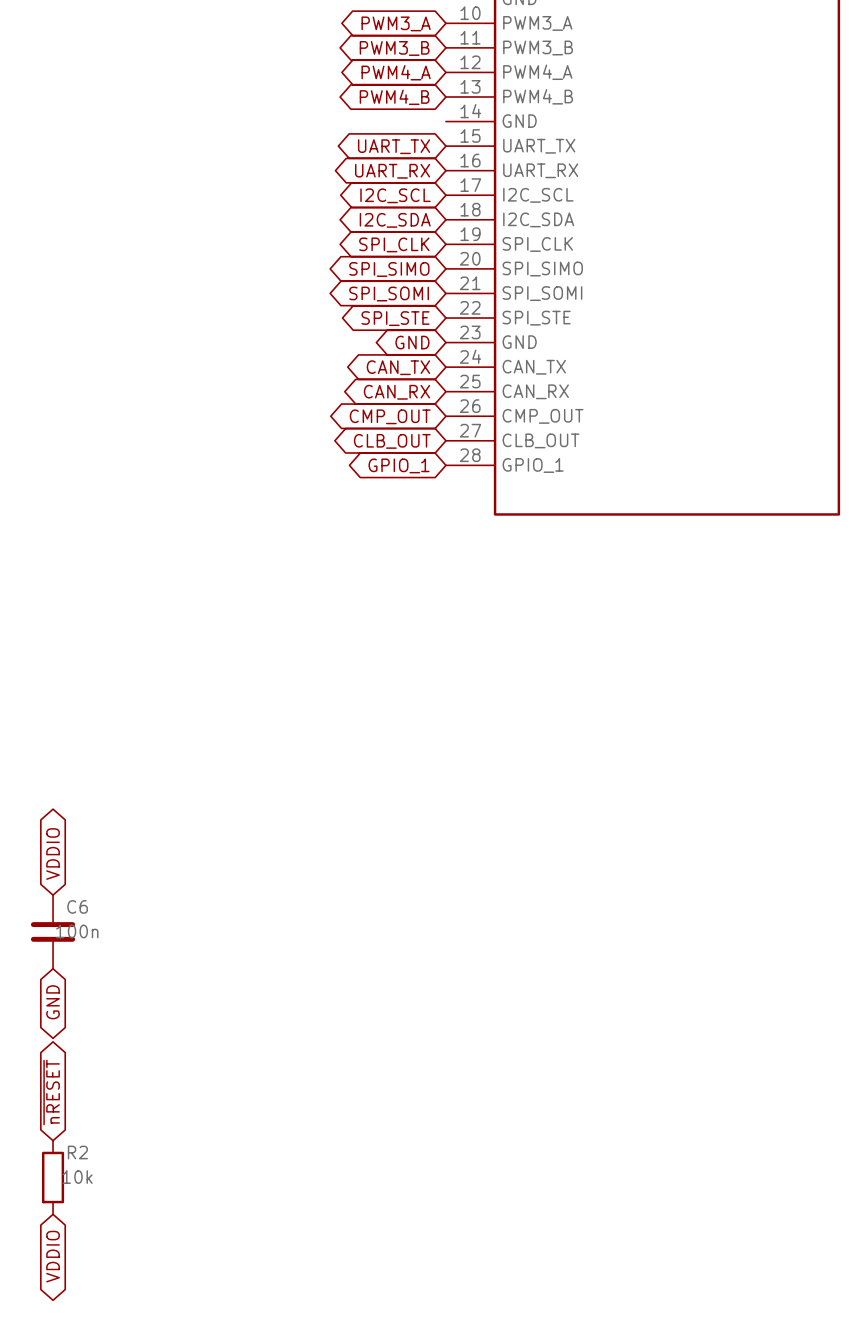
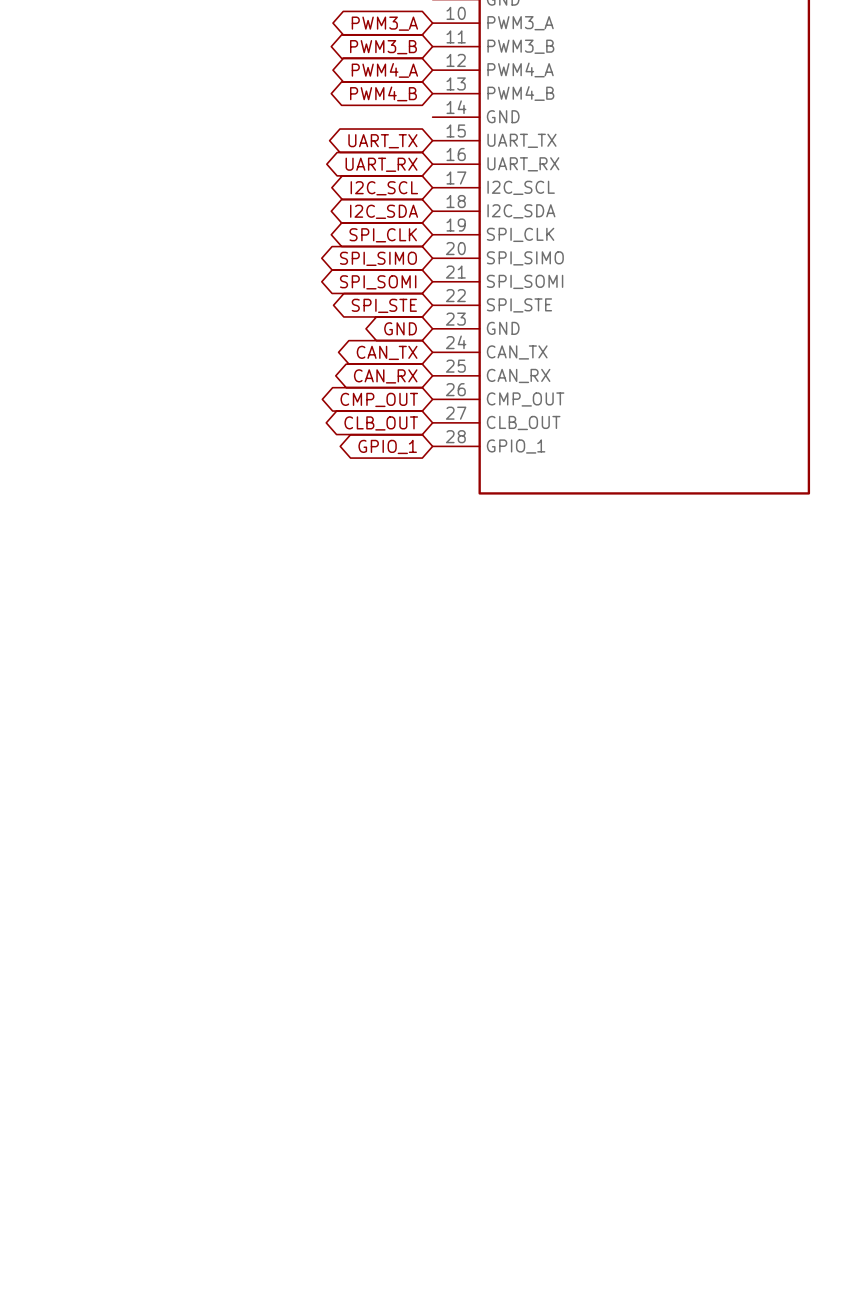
global label: VDDIO (53, 854) -> none
C6: 100n (53, 931) -> none
global label: GND (53, 1002) -> none
global label: ~{nRESET} (51, 1092) -> none
R2: 10k (53, 1177) -> none
global label: VDDIO (53, 1256) -> none

